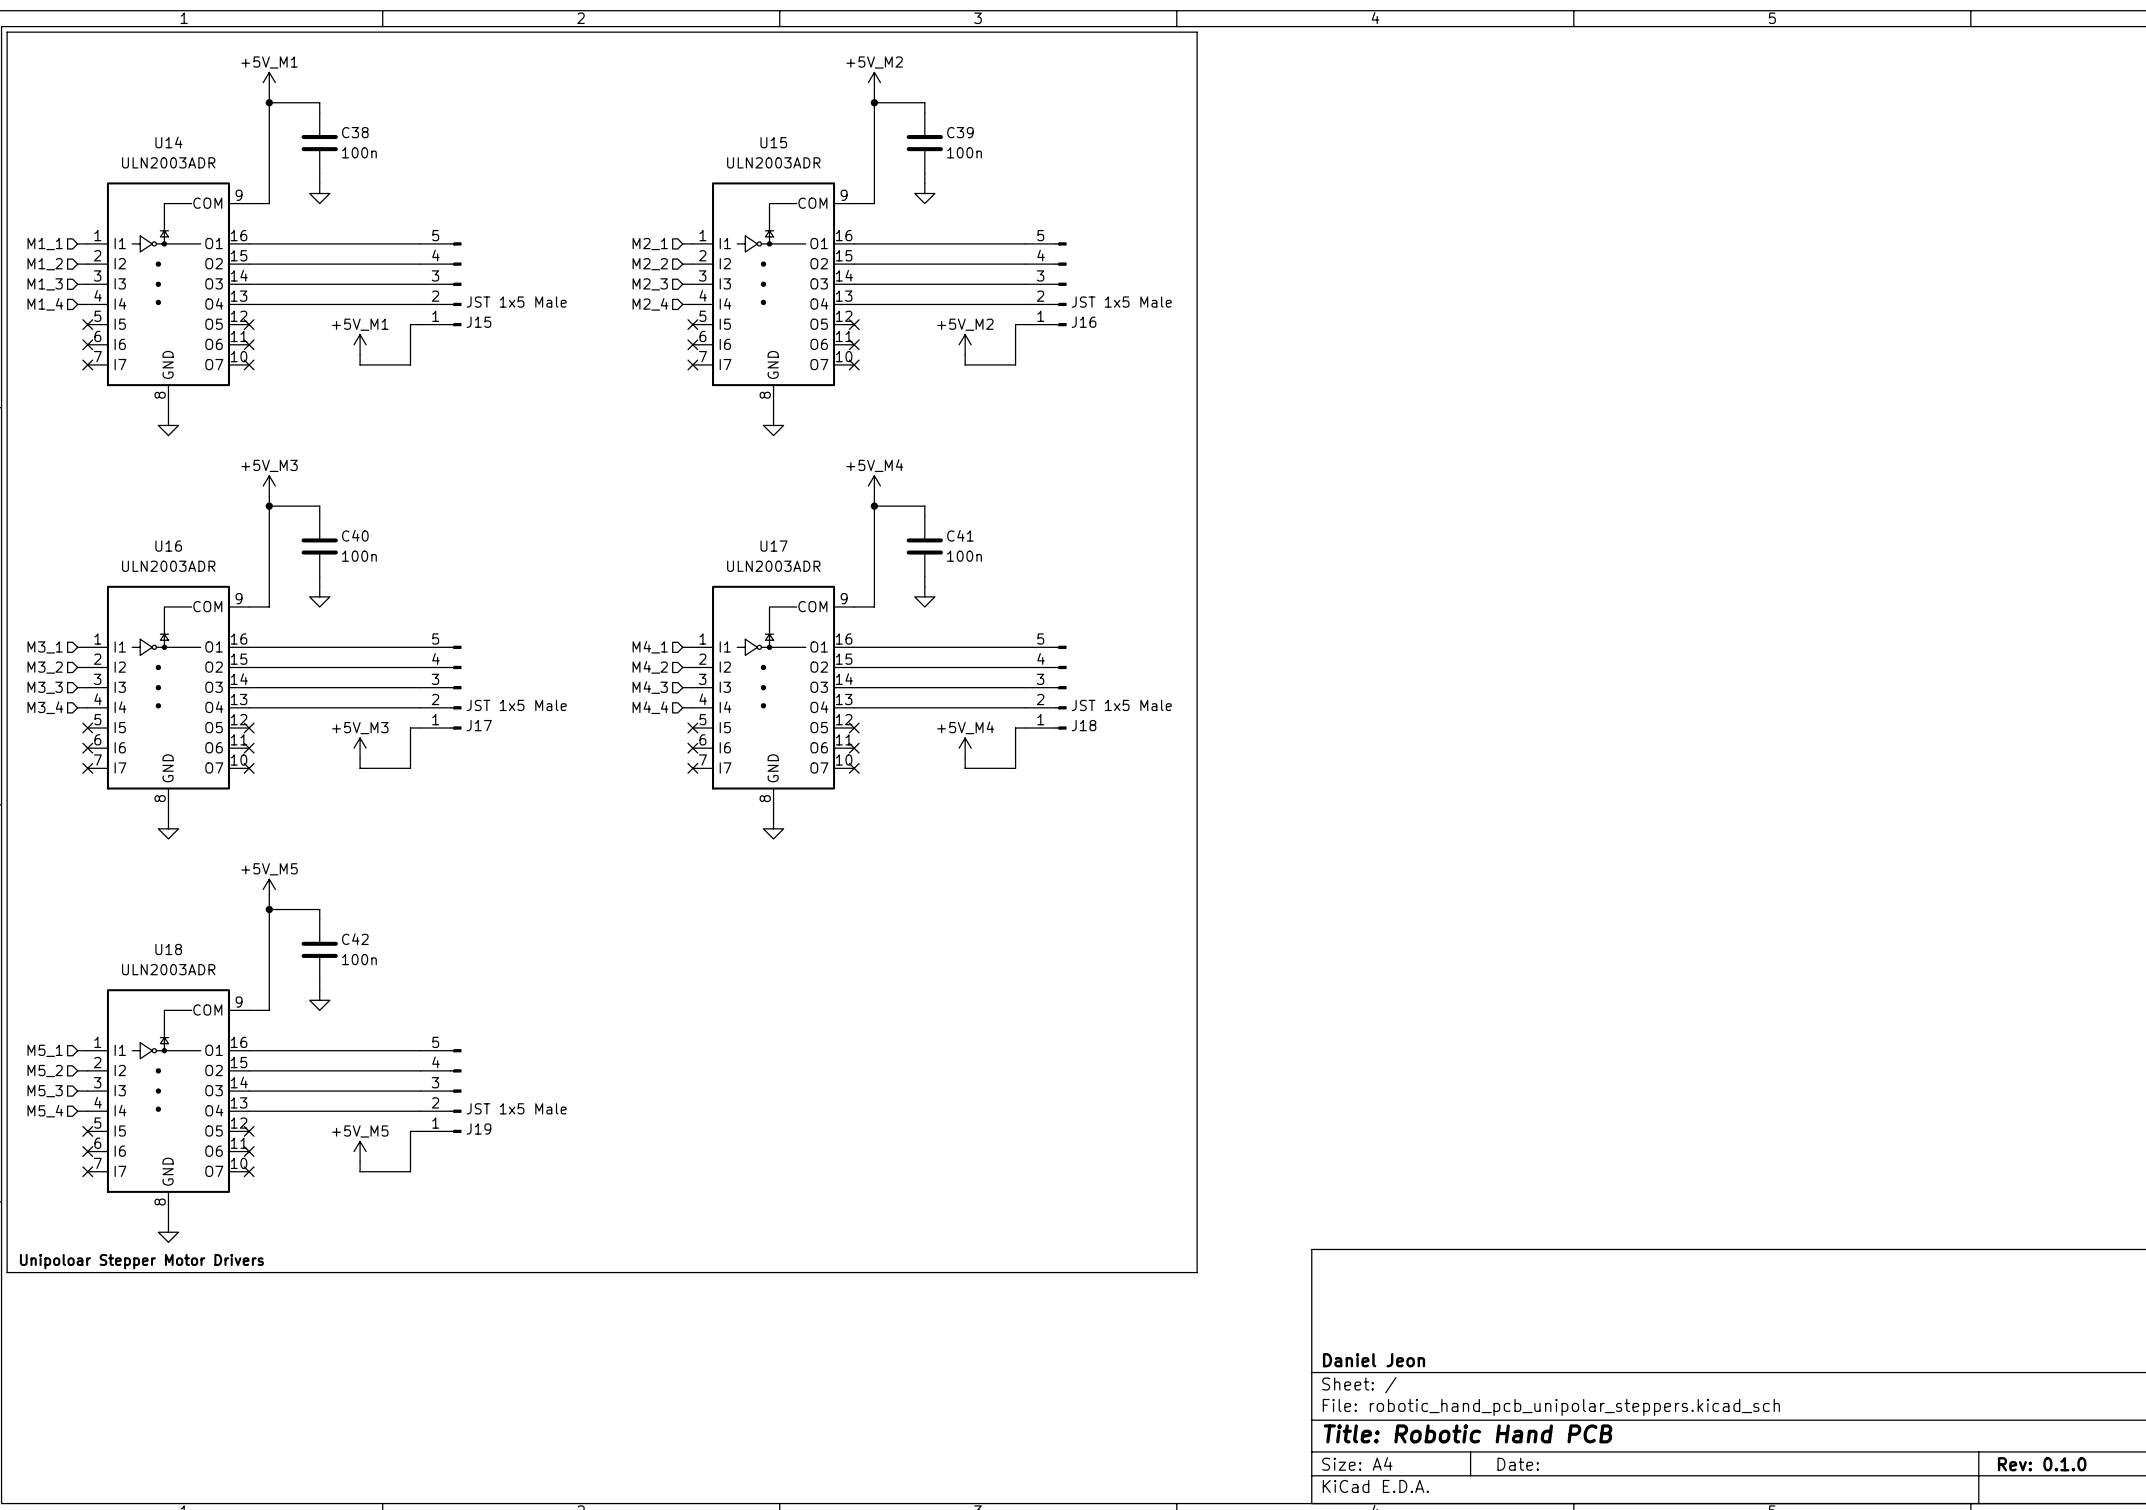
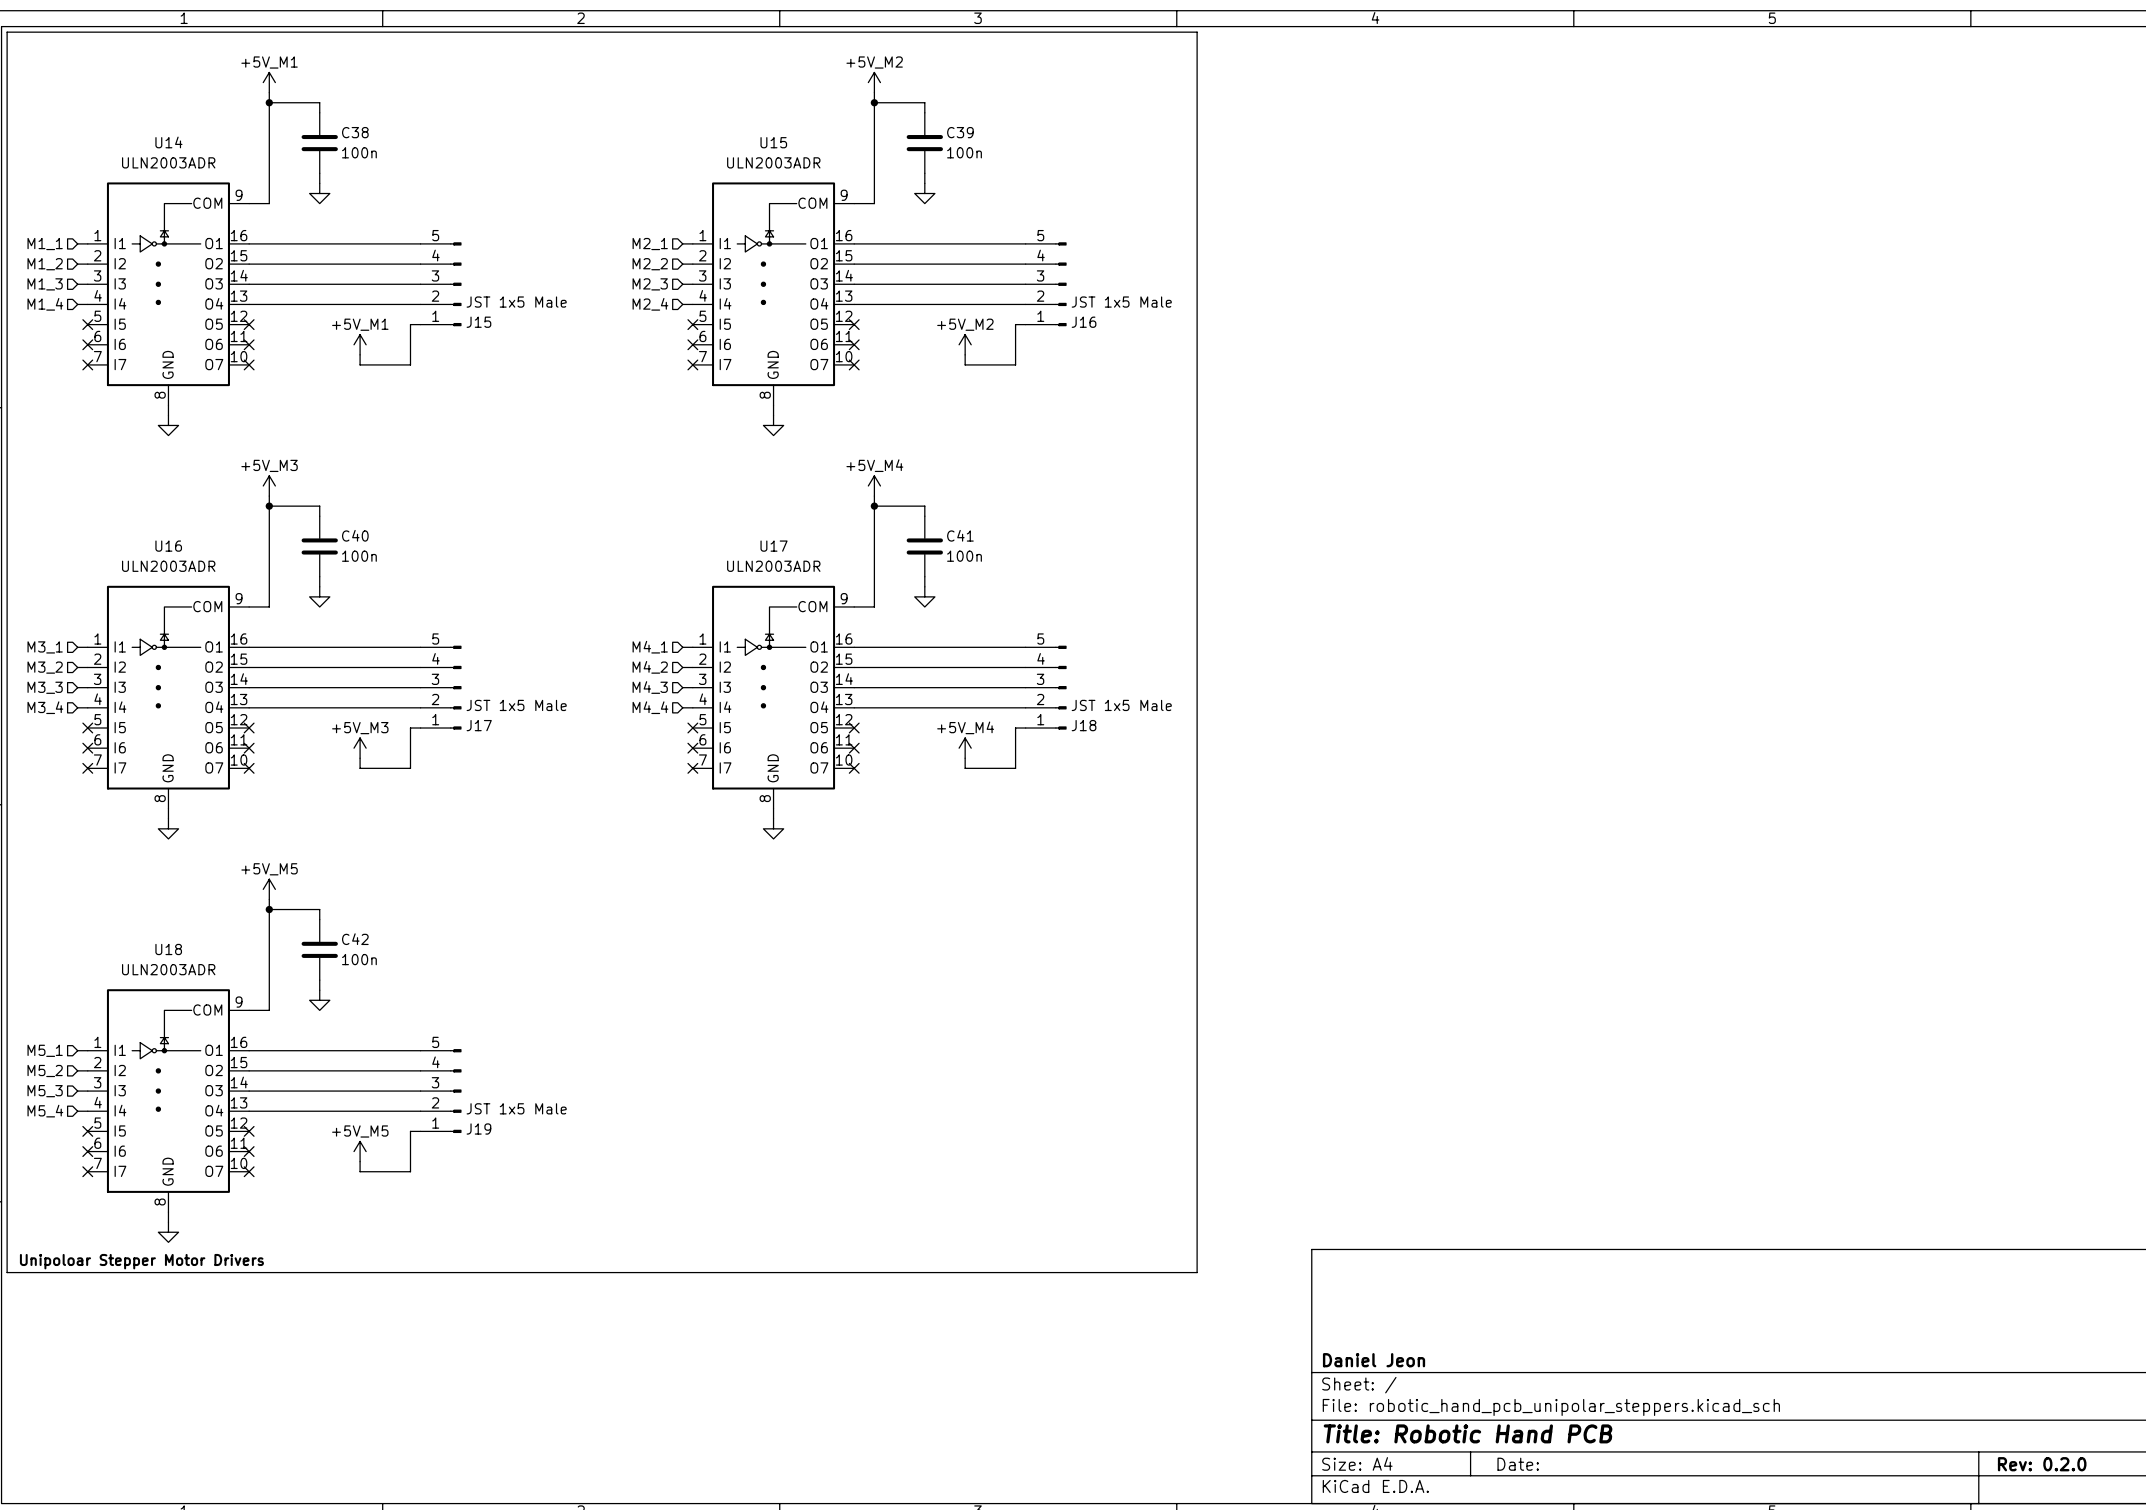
title block: Rev: 0.1.0 (2042, 1464) -> Rev: 0.2.0 (2042, 1464)

